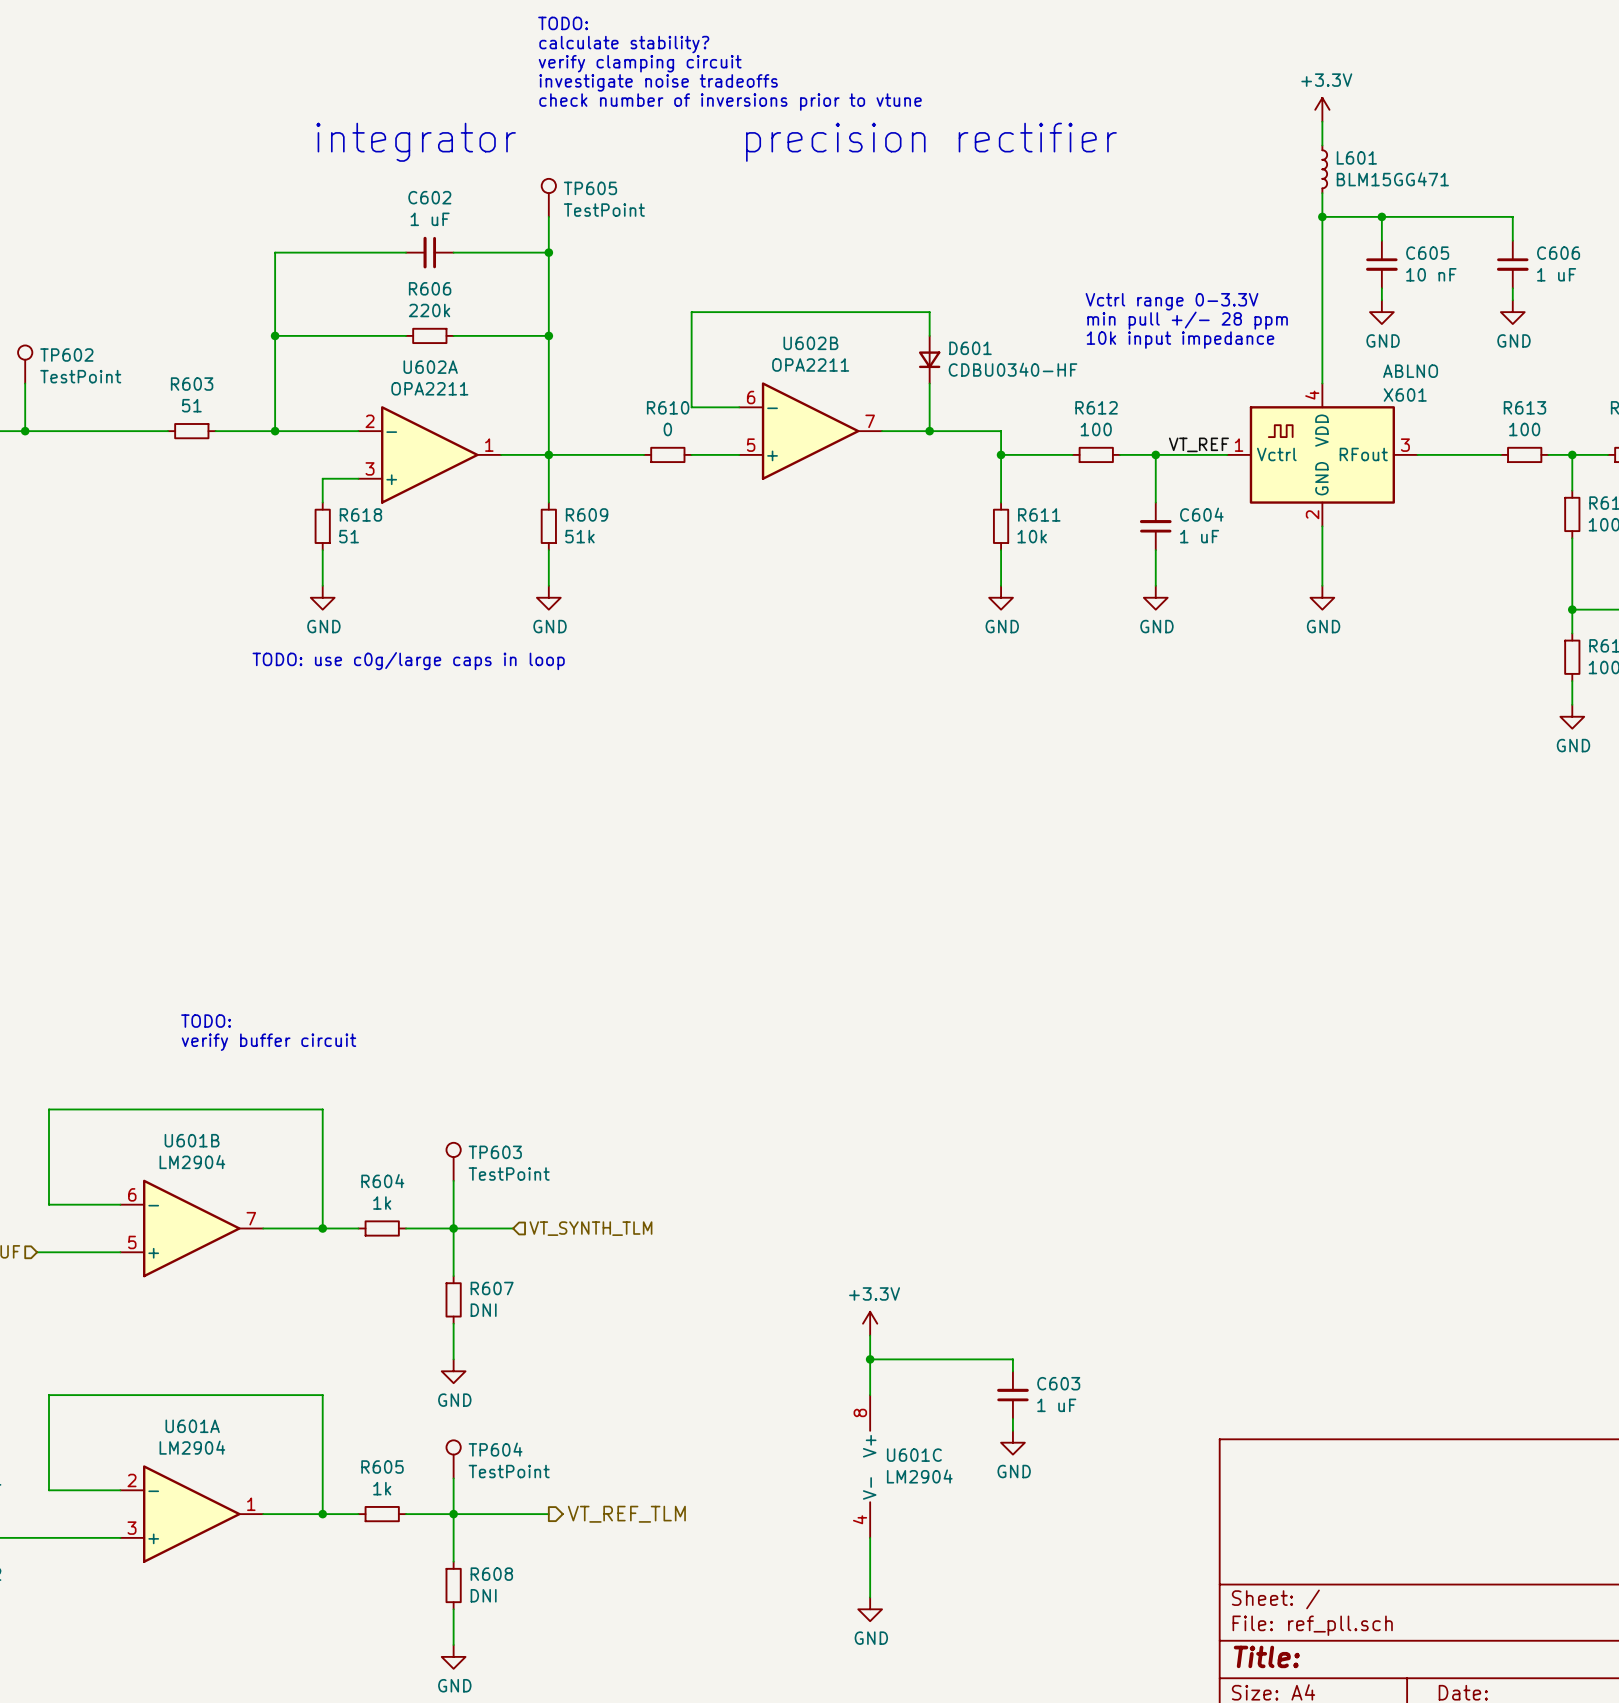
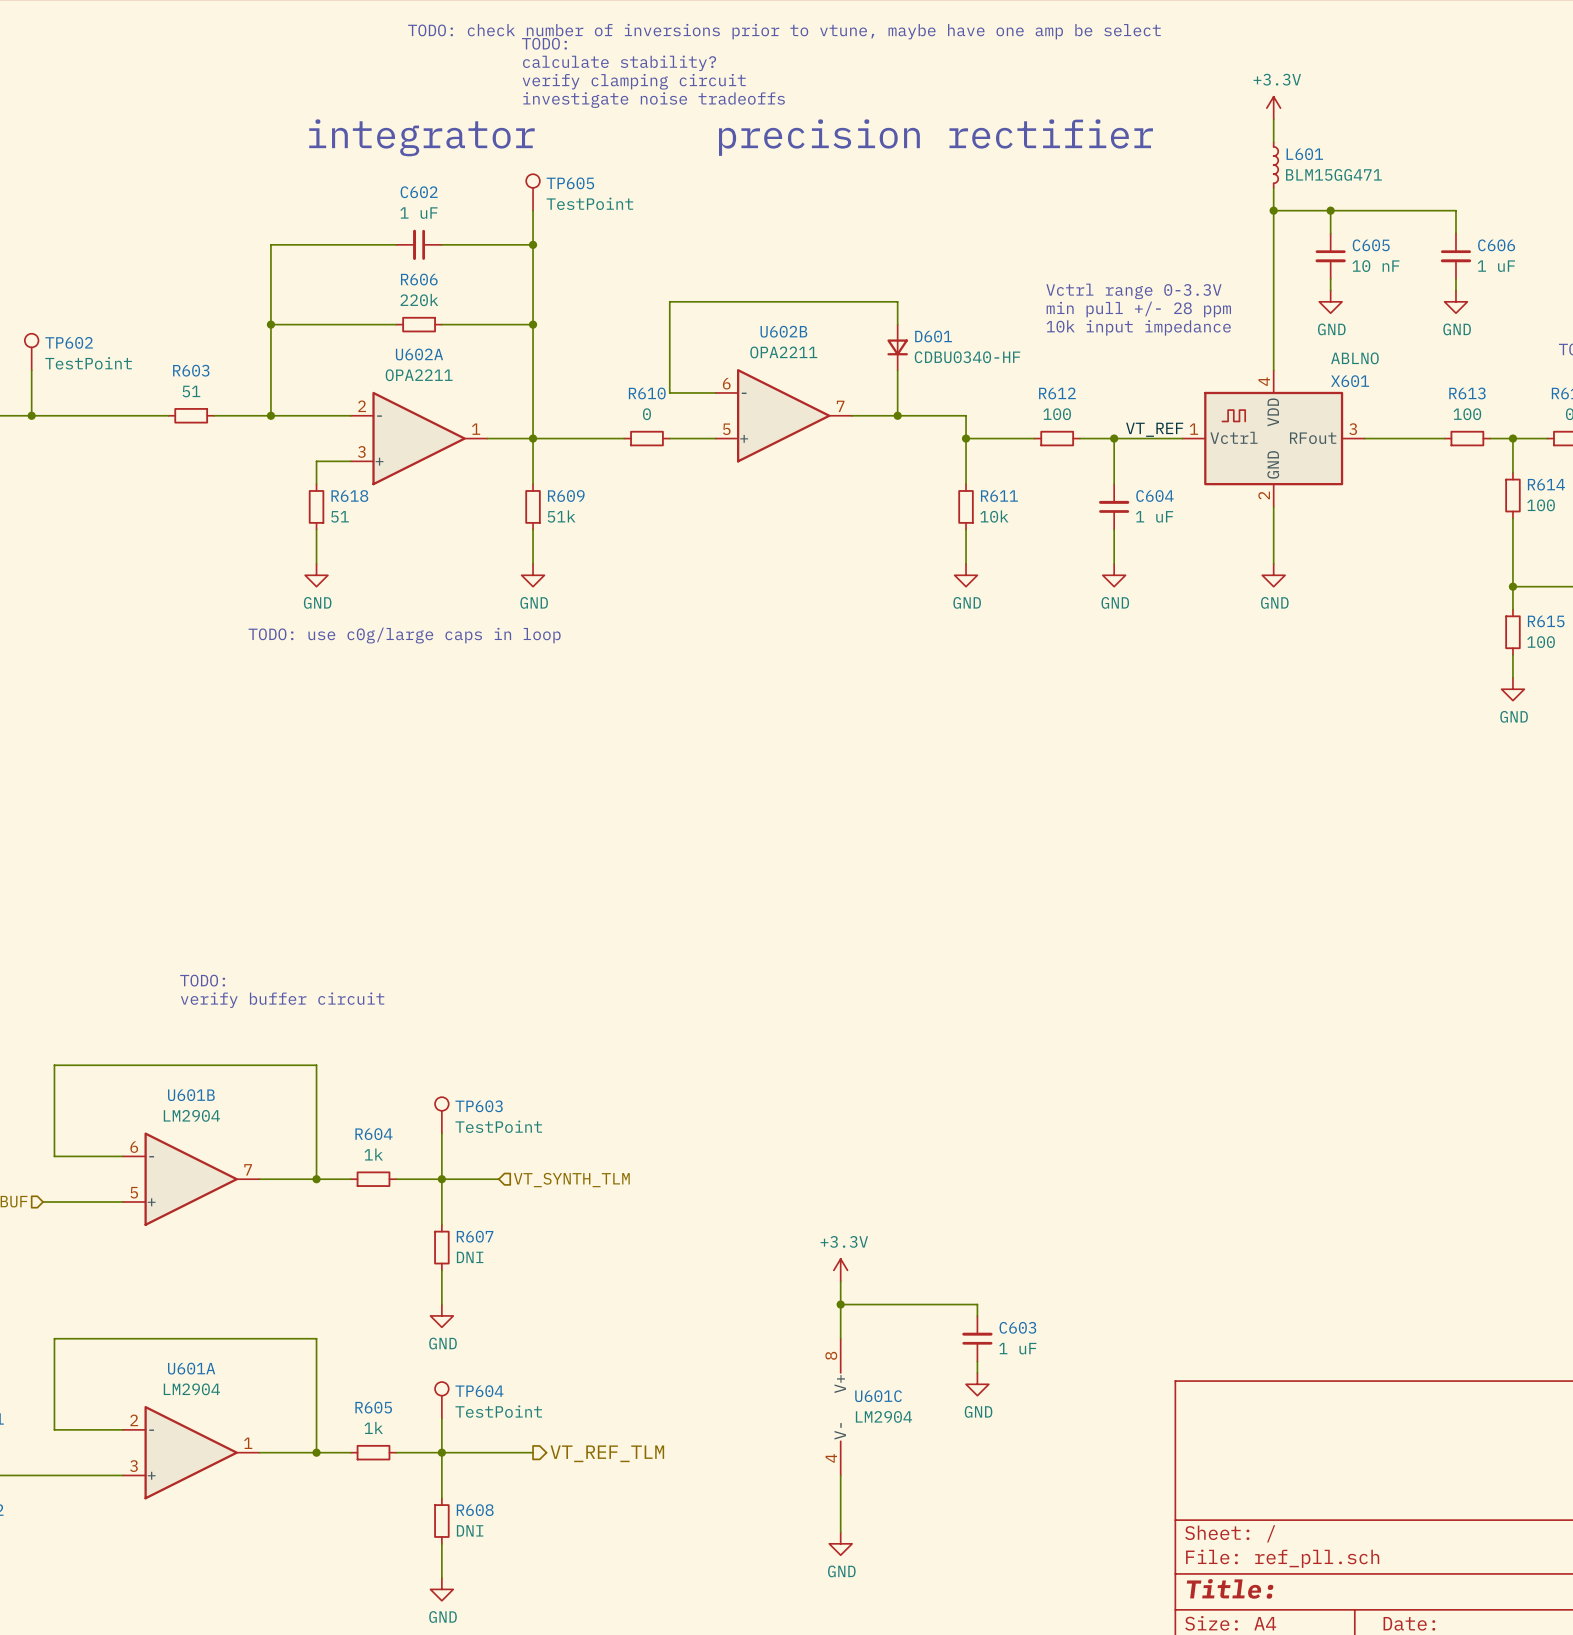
text: TODO: (563, 23) -> none
text: none -> TODO: check number of inversions prior to vtune, maybe have one amp be select (784, 31)
text: calculate stability? (624, 44) -> TODO: (544, 43)
text: verify clamping circuit (640, 63) -> calculate stability? (619, 63)
text: investigate noise tradeoffs (658, 82) -> verify clamping circuit (634, 81)
text: check number of inversions prior to vtune (730, 102) -> investigate noise tradeoffs (654, 100)

